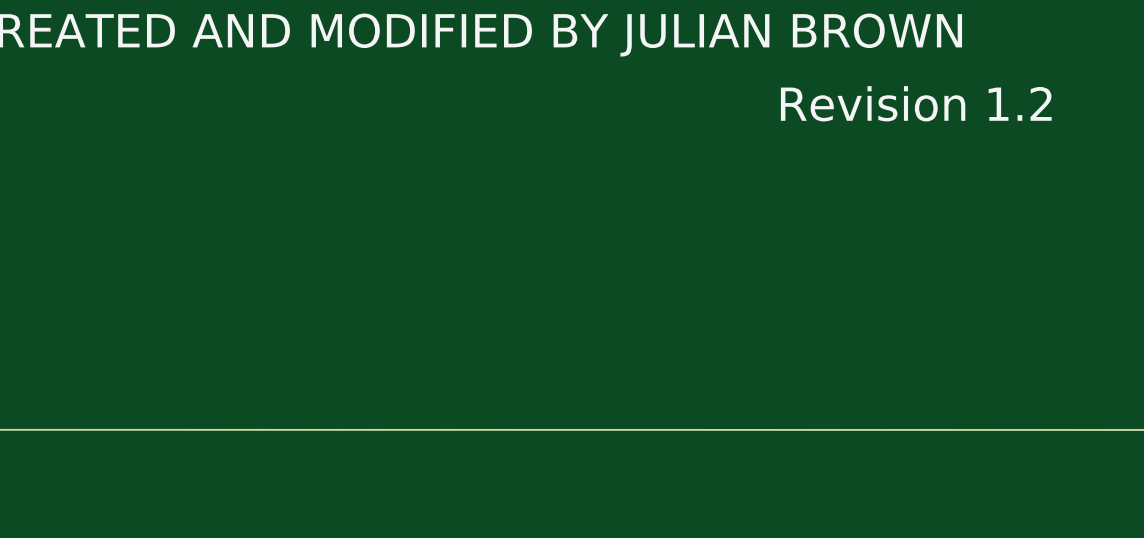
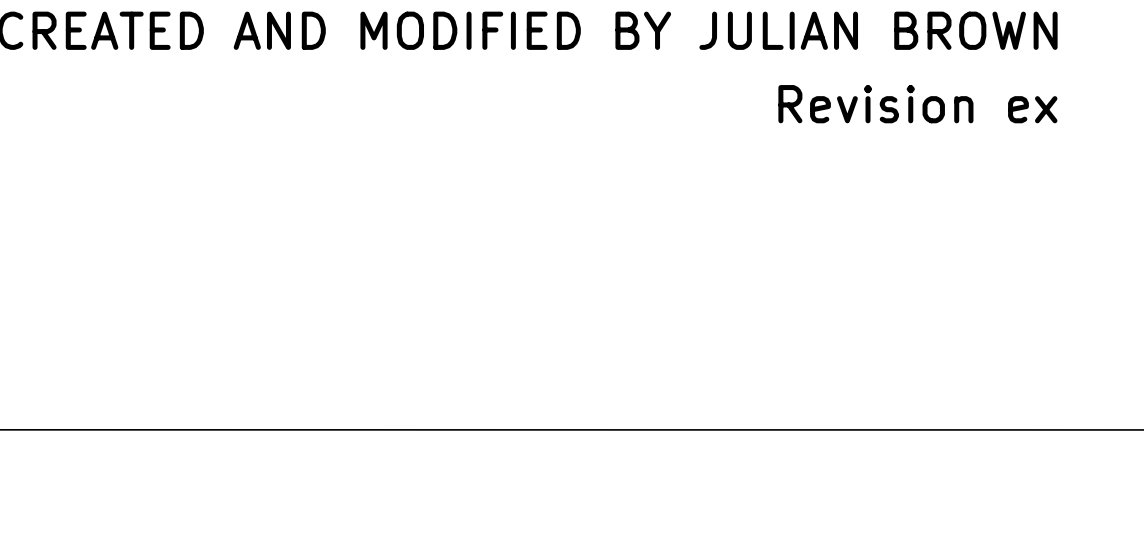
text: Revision 1.2 (916, 103) -> Revision ex (917, 104)

